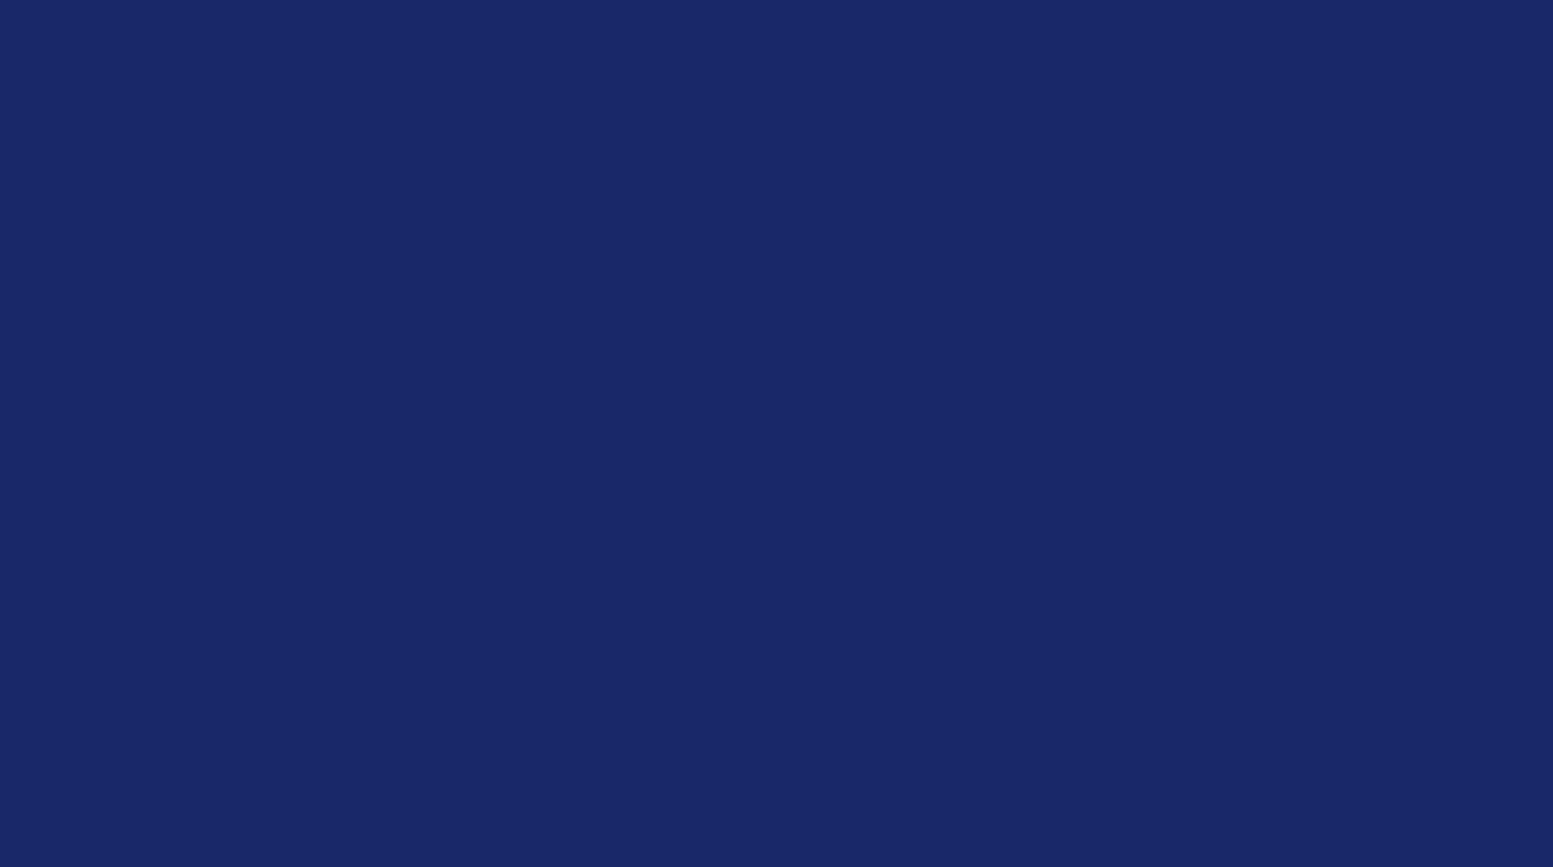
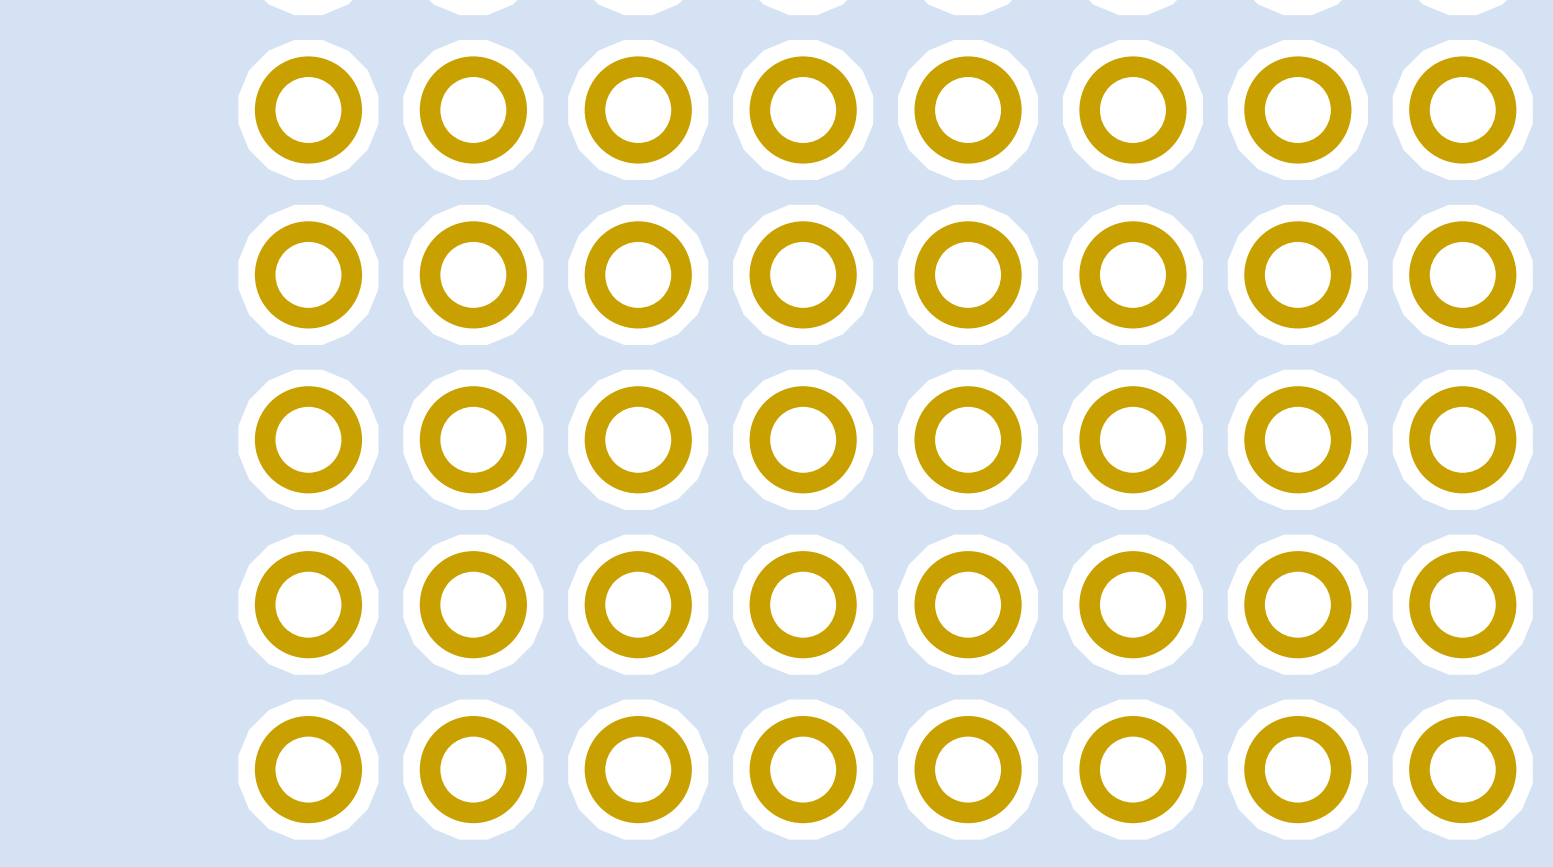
part: none -> (308, 109)
part: none -> (473, 109)
part: none -> (638, 109)
part: none -> (803, 109)
part: none -> (968, 109)
part: none -> (1132, 109)
part: none -> (1297, 109)
part: none -> (1462, 109)
part: none -> (308, 274)
part: none -> (473, 274)
part: none -> (638, 274)
part: none -> (803, 274)
part: none -> (968, 274)
part: none -> (1132, 274)
part: none -> (1297, 274)
part: none -> (1462, 274)
part: none -> (308, 439)
part: none -> (473, 439)
part: none -> (638, 439)
part: none -> (803, 439)
part: none -> (968, 439)
part: none -> (1132, 439)
part: none -> (1297, 439)
part: none -> (1462, 439)
part: none -> (308, 604)
part: none -> (473, 604)
part: none -> (638, 604)
part: none -> (803, 604)
part: none -> (968, 604)
part: none -> (1132, 604)
part: none -> (1297, 604)
part: none -> (1462, 604)
part: none -> (308, 769)
part: none -> (473, 769)
part: none -> (638, 769)
part: none -> (803, 769)
part: none -> (968, 769)
part: none -> (1132, 769)
part: none -> (1297, 769)
part: none -> (1462, 769)

